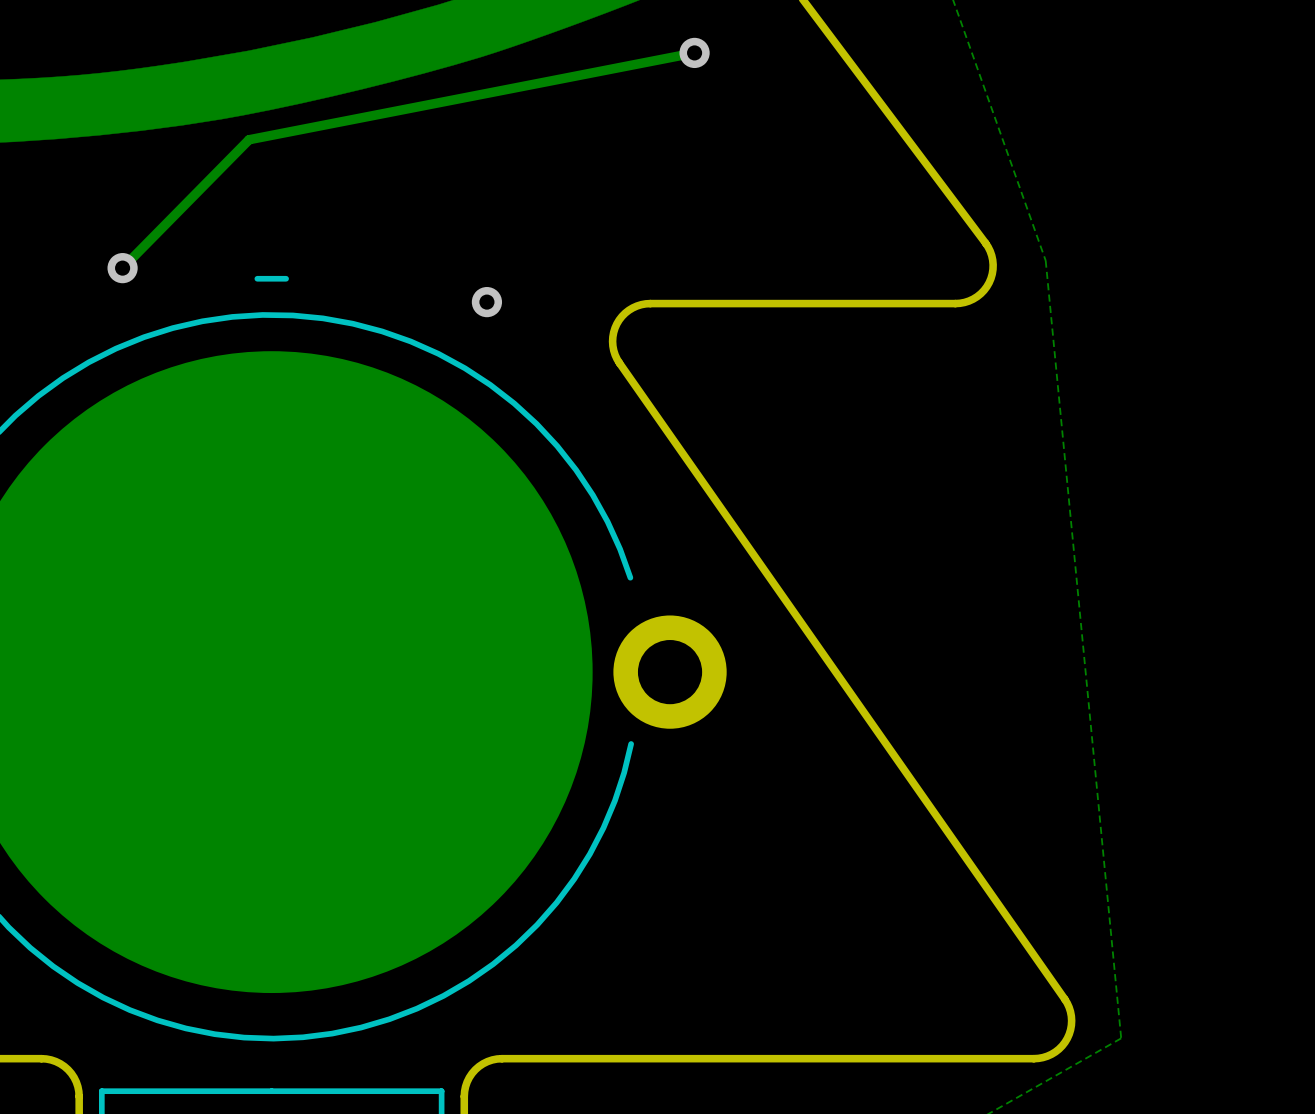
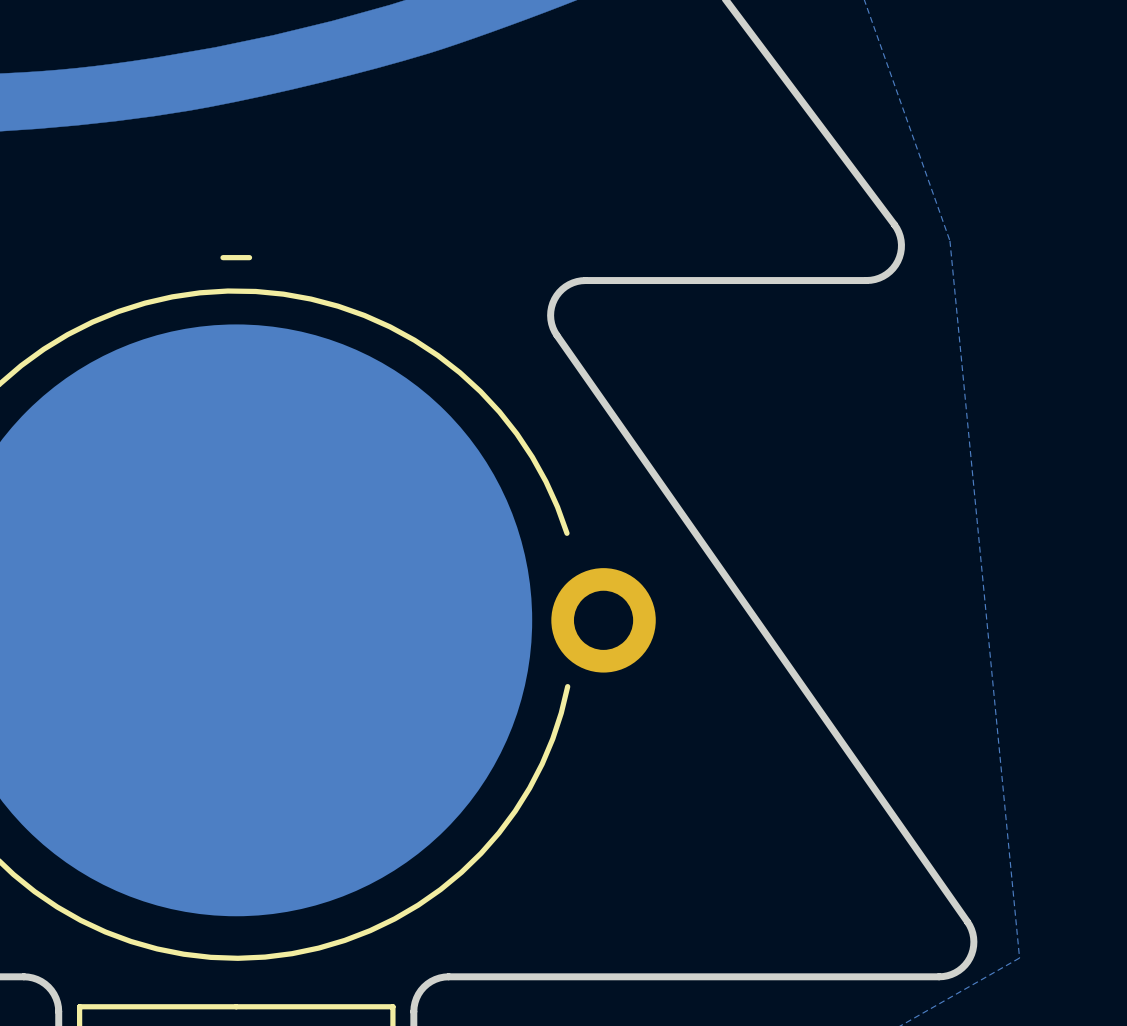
track: (694, 52) (249, 139) (122, 268) -> none
via: (694, 52) -> none
via: (122, 268) -> none
via: (486, 302) -> none

